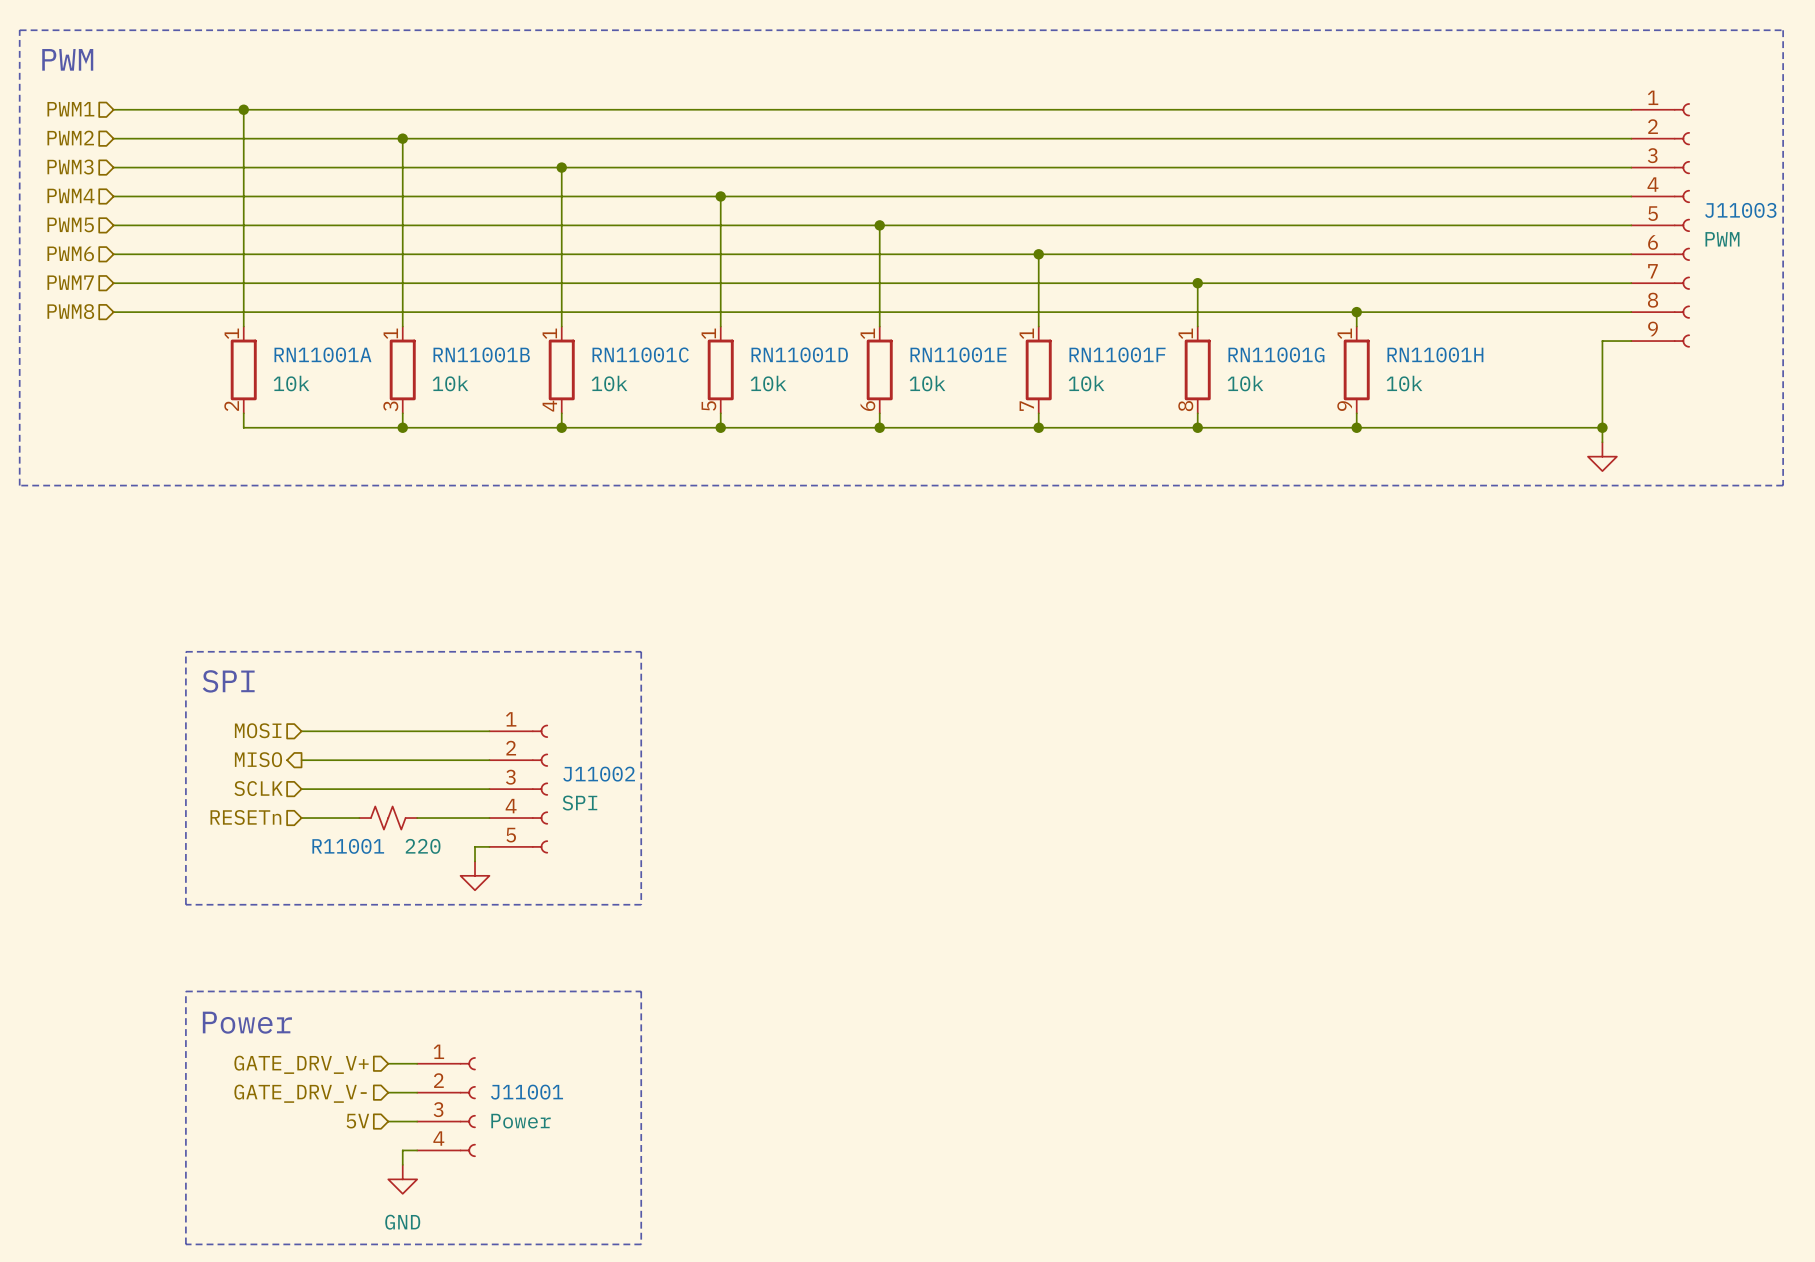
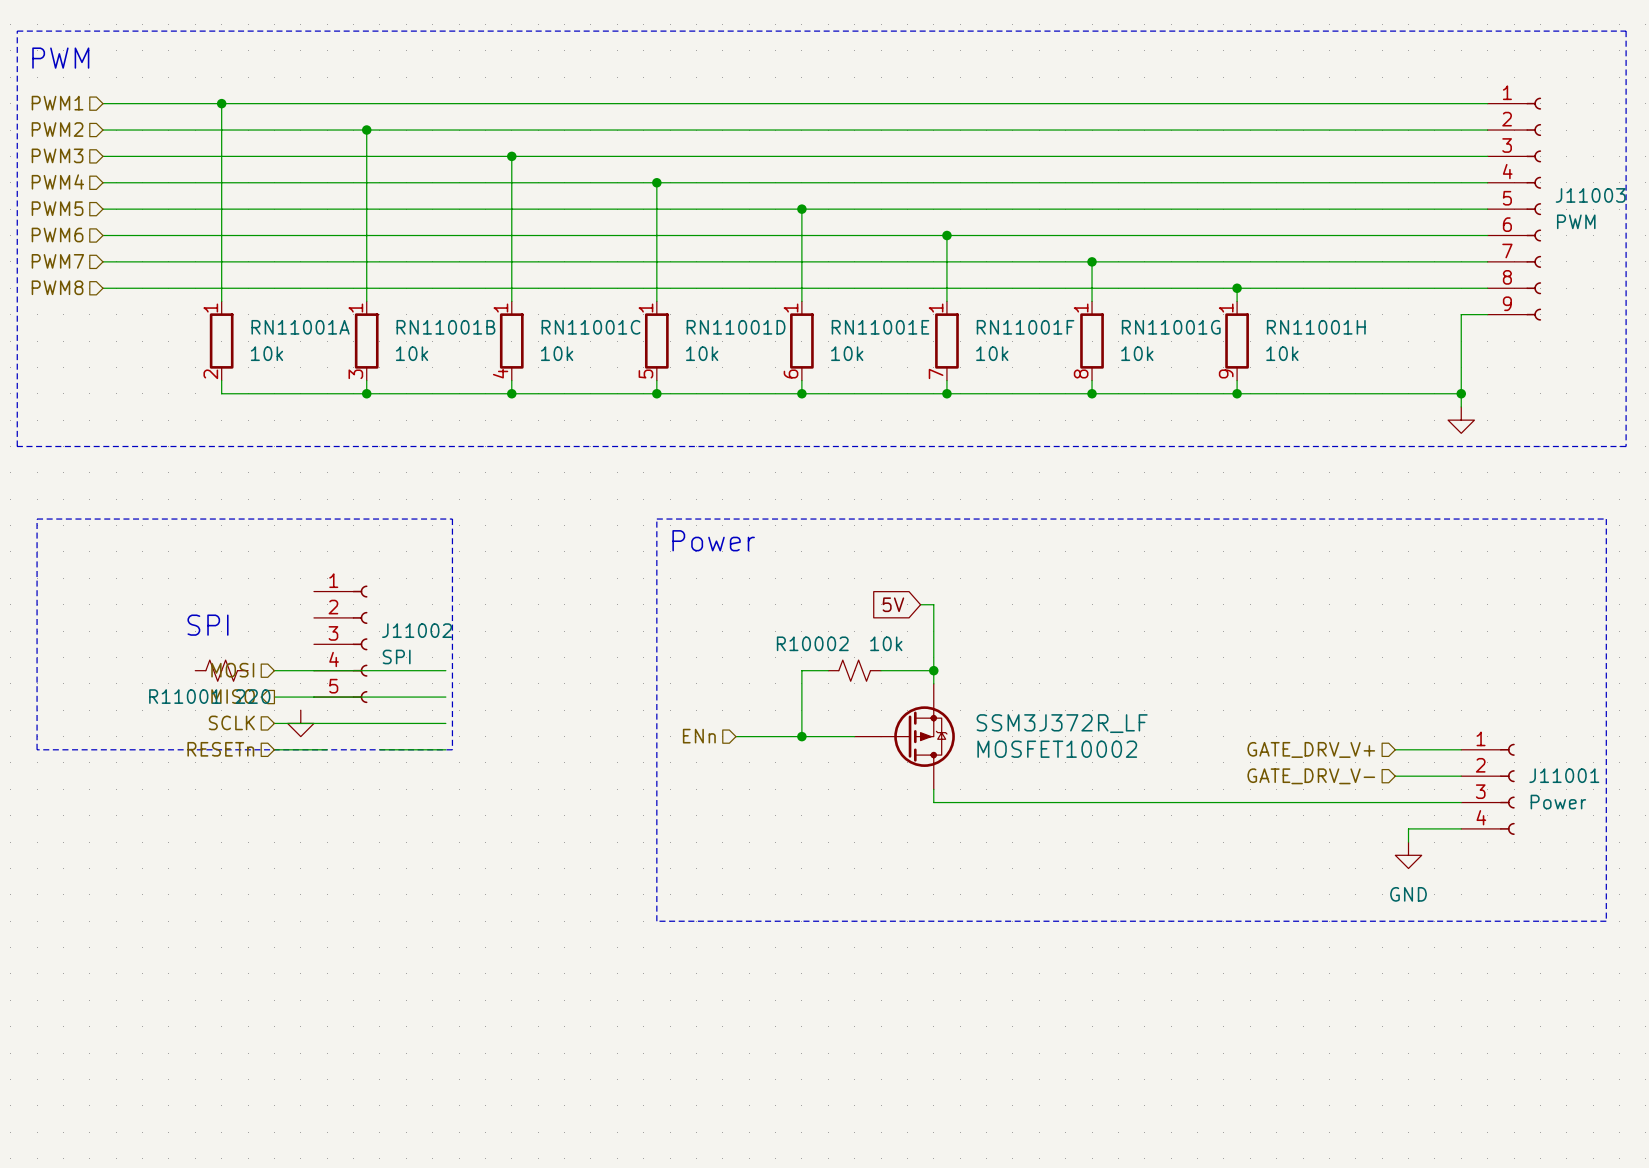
line: none -> (656, 519) (1606, 519) (1606, 921) (656, 921) (656, 519)
text: none -> Power (713, 540)
line: (185, 651) (641, 651) (641, 904) (185, 904) (185, 651) -> (37, 519) (452, 519) (452, 749) (37, 749) (37, 519)
global label: none -> 5V (893, 604)
wire: none -> (920, 604) (933, 604) (933, 683)
wire: none -> (828, 670) (801, 670) (801, 736)
R10002: none -> 10k (854, 670)
wire: none -> (881, 670) (933, 670)
junction: none -> (933, 670)
J11002 position: (518, 789) -> (340, 644)
hierarchical label: none -> ENn (699, 736)
wire: none -> (735, 736) (854, 736)
junction: none -> (801, 736)
MOSFET10002: none -> SSM3J372R_LF (904, 736)
R11001 position: (388, 818) -> (221, 670)
wire: none -> (1395, 749) (1461, 749)
hierarchical label: none -> GATE_DRV_V+ (1311, 749)
wire: (489, 846) (475, 846) (475, 861) -> none
wire: none -> (1395, 776) (1461, 776)
hierarchical label: none -> GATE_DRV_V- (1311, 776)
wire: none -> (933, 789) (933, 802) (1461, 802)
power symbol position: (475, 875) -> (300, 723)
wire: none -> (1461, 828) (1408, 828) (1408, 842)
power symbol: none -> GND (1408, 855)
line: (185, 991) (185, 1244) (641, 1244) (641, 991) (185, 991) -> none
text: Power (247, 1022) -> none
wire: (388, 1063) (417, 1063) -> none
hierarchical label: GATE_DRV_V+ (301, 1064) -> none
wire: (388, 1092) (417, 1092) -> none
hierarchical label: GATE_DRV_V- (300, 1093) -> none
J11001 position: (446, 1107) -> (1488, 789)
hierarchical label: 5V (357, 1121) -> none
wire: (388, 1121) (417, 1121) -> none
wire: (417, 1150) (402, 1150) (402, 1164) -> none
power symbol: GND (402, 1179) -> none

